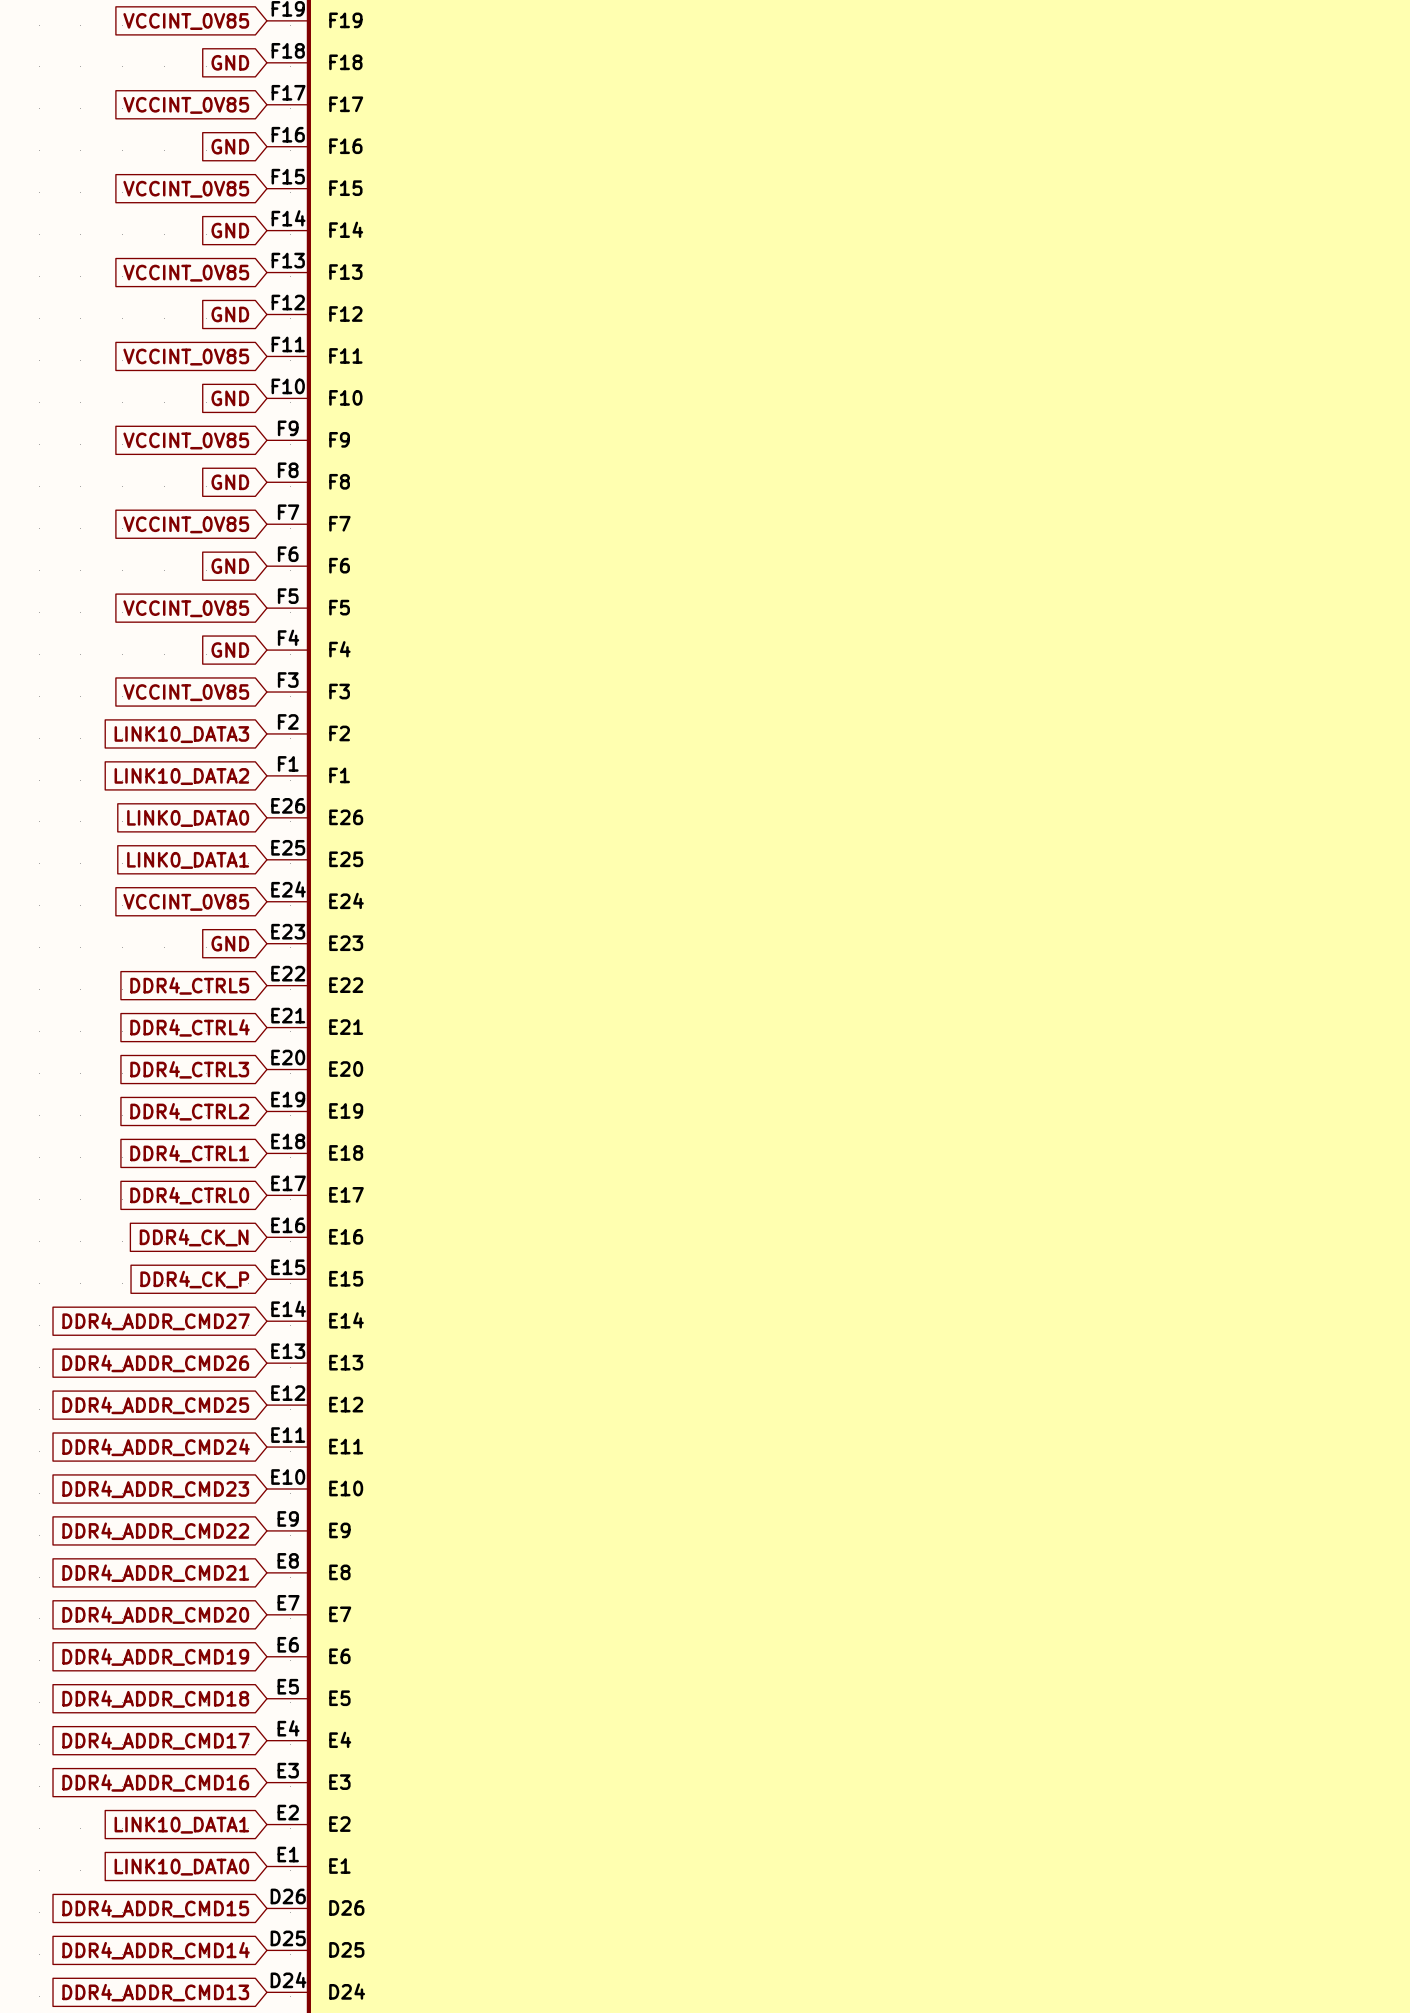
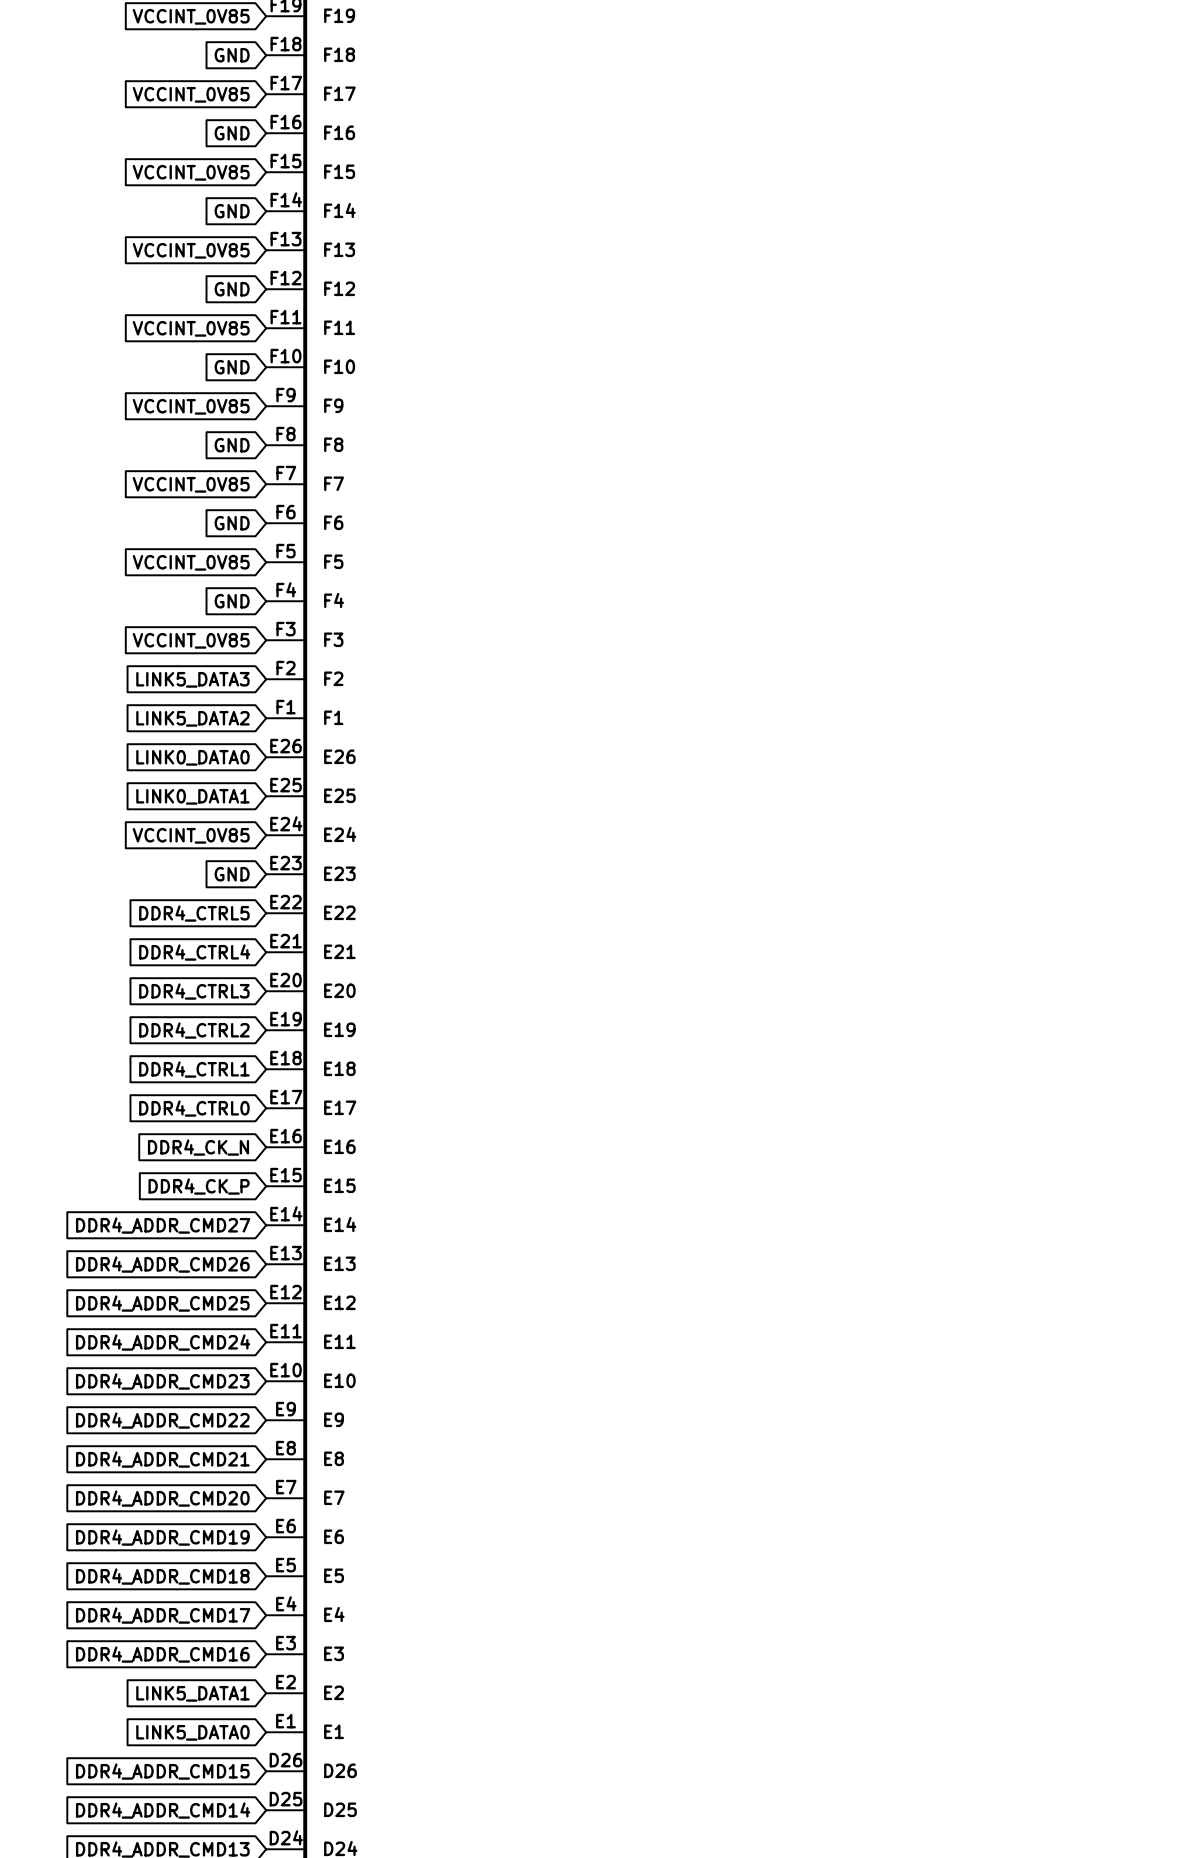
global label: LINK10_DATA3 (181, 734) -> LINK5_DATA3 (192, 679)
global label: LINK10_DATA2 (181, 776) -> LINK5_DATA2 (192, 718)
global label: LINK10_DATA1 (181, 1825) -> LINK5_DATA1 (192, 1693)
global label: LINK10_DATA0 (181, 1867) -> LINK5_DATA0 (192, 1732)

